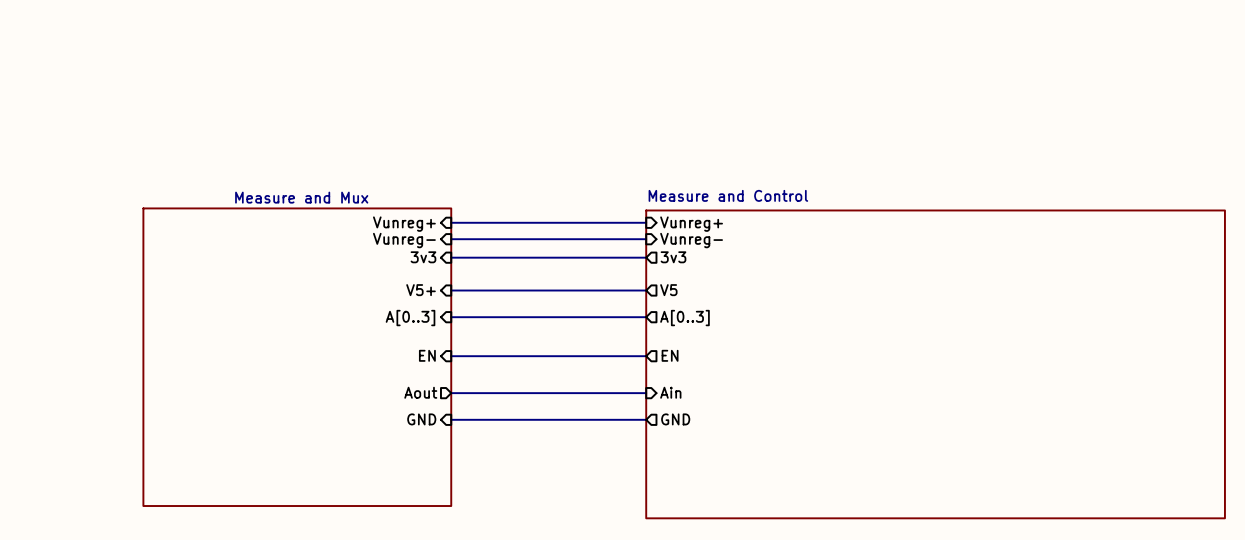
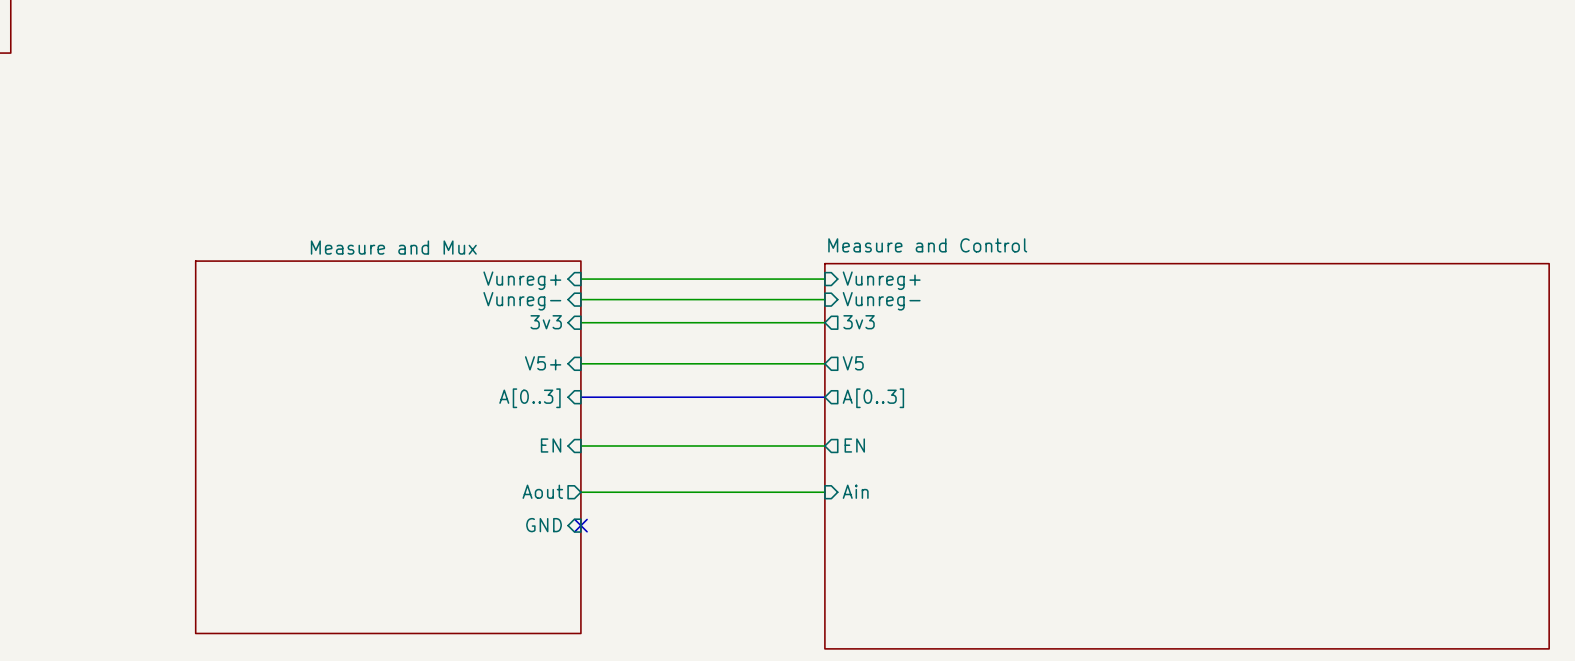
wire: (451, 419) (646, 419) -> none
no-connect mark: none -> (580, 525)
sheet pin: GND (675, 419) -> none

